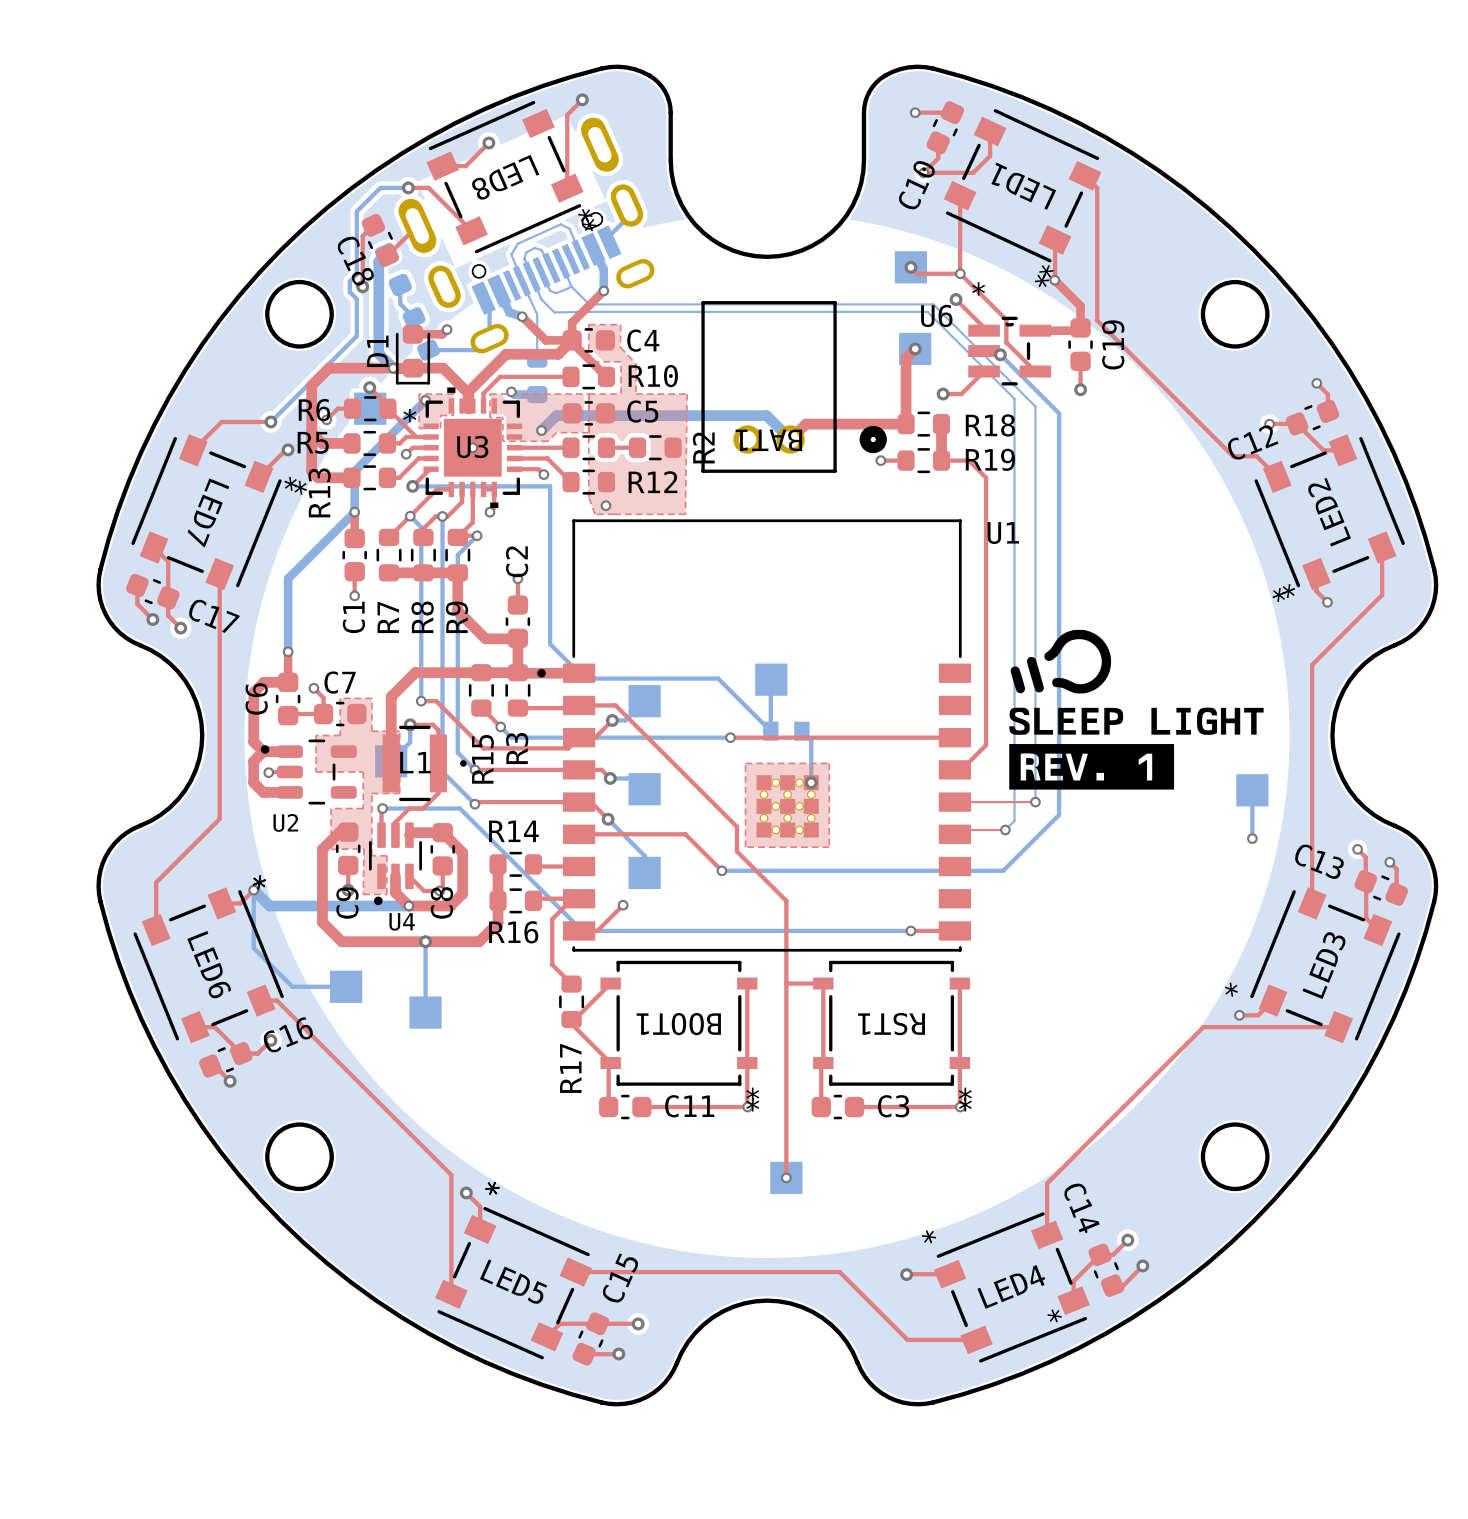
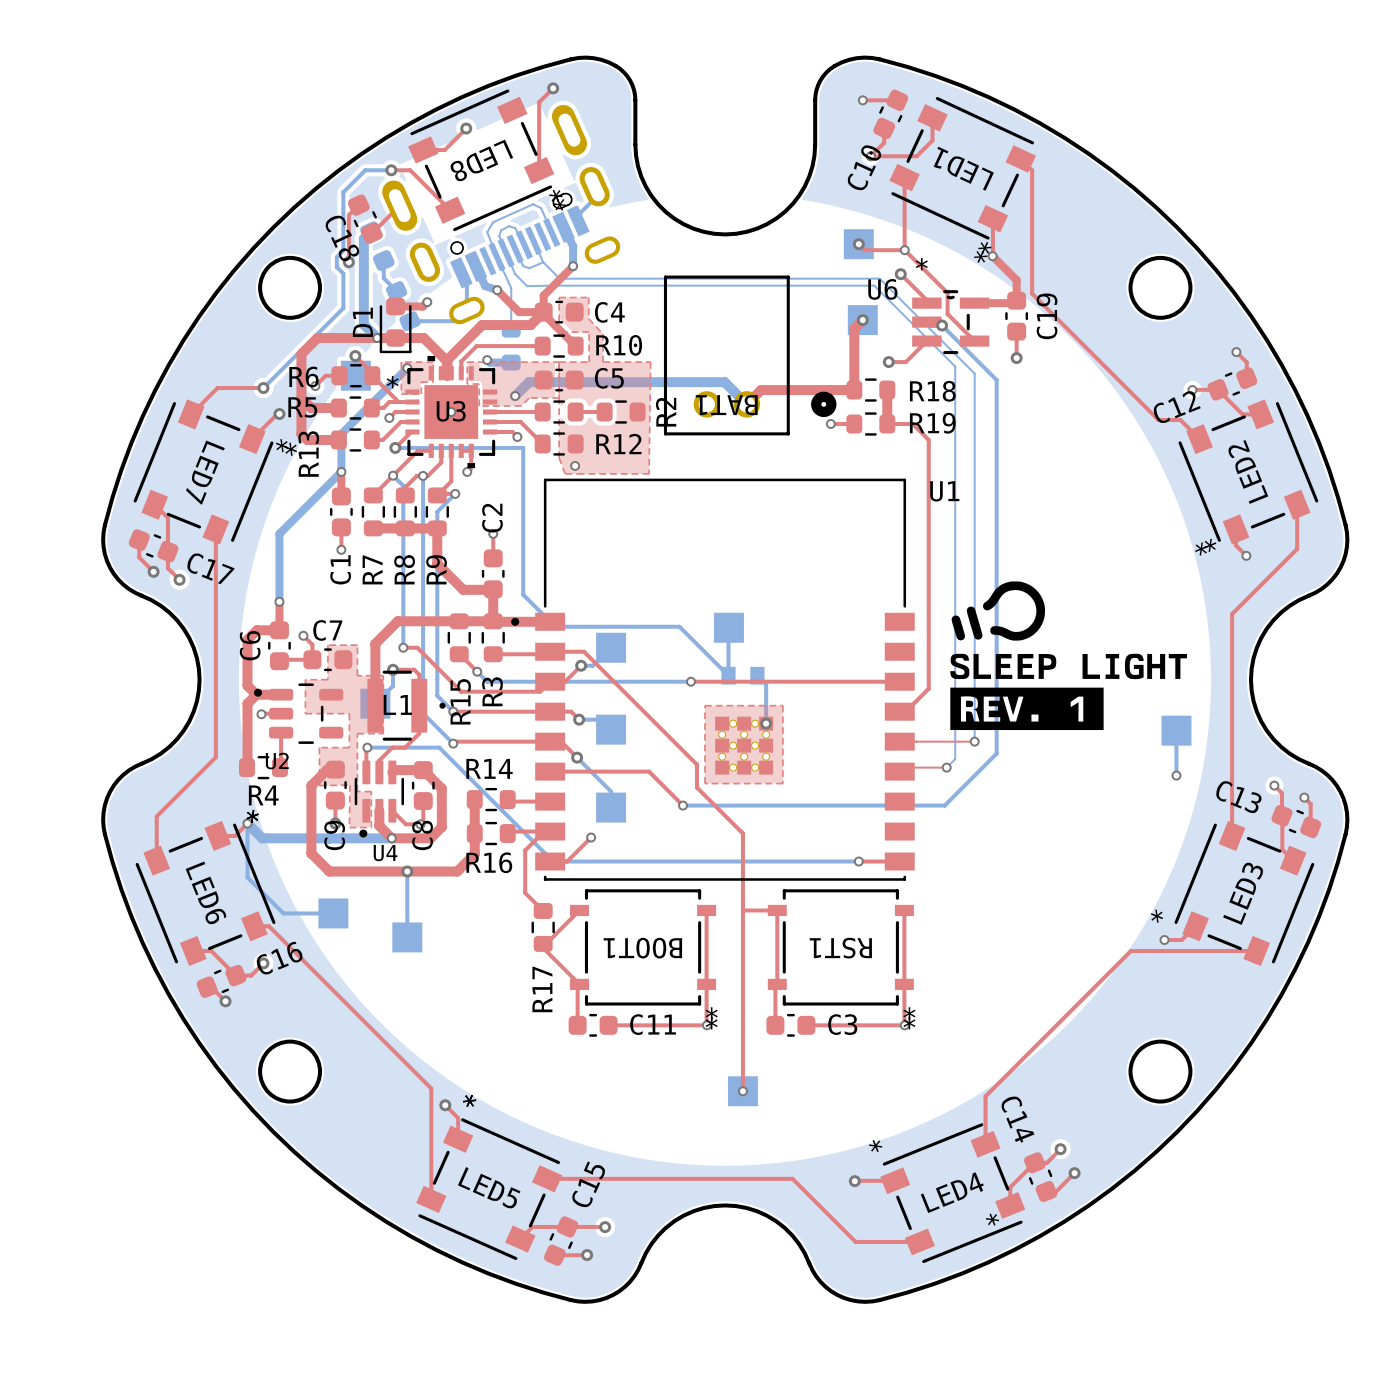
top track: (253, 782) (263, 792) (289, 792) -> (247, 723) (248, 767)
top track: none -> (281, 732) (279, 767)
R4: none -> (263, 767)

